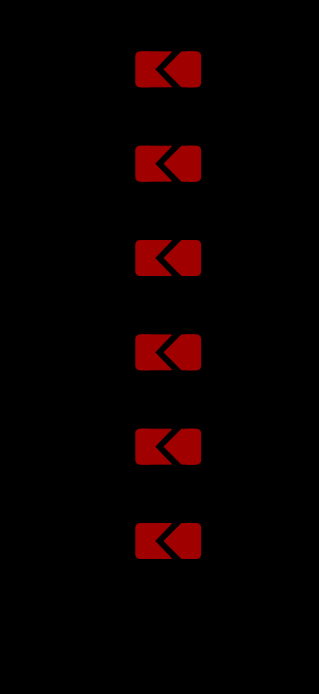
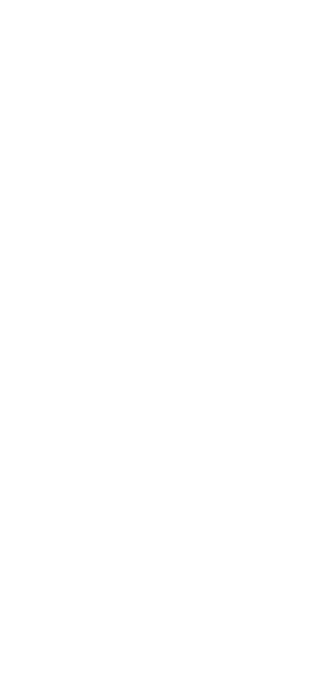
part: (168, 69) -> none
part: (168, 163) -> none
part: (168, 258) -> none
part: (168, 352) -> none
part: (168, 446) -> none
part: (168, 541) -> none

